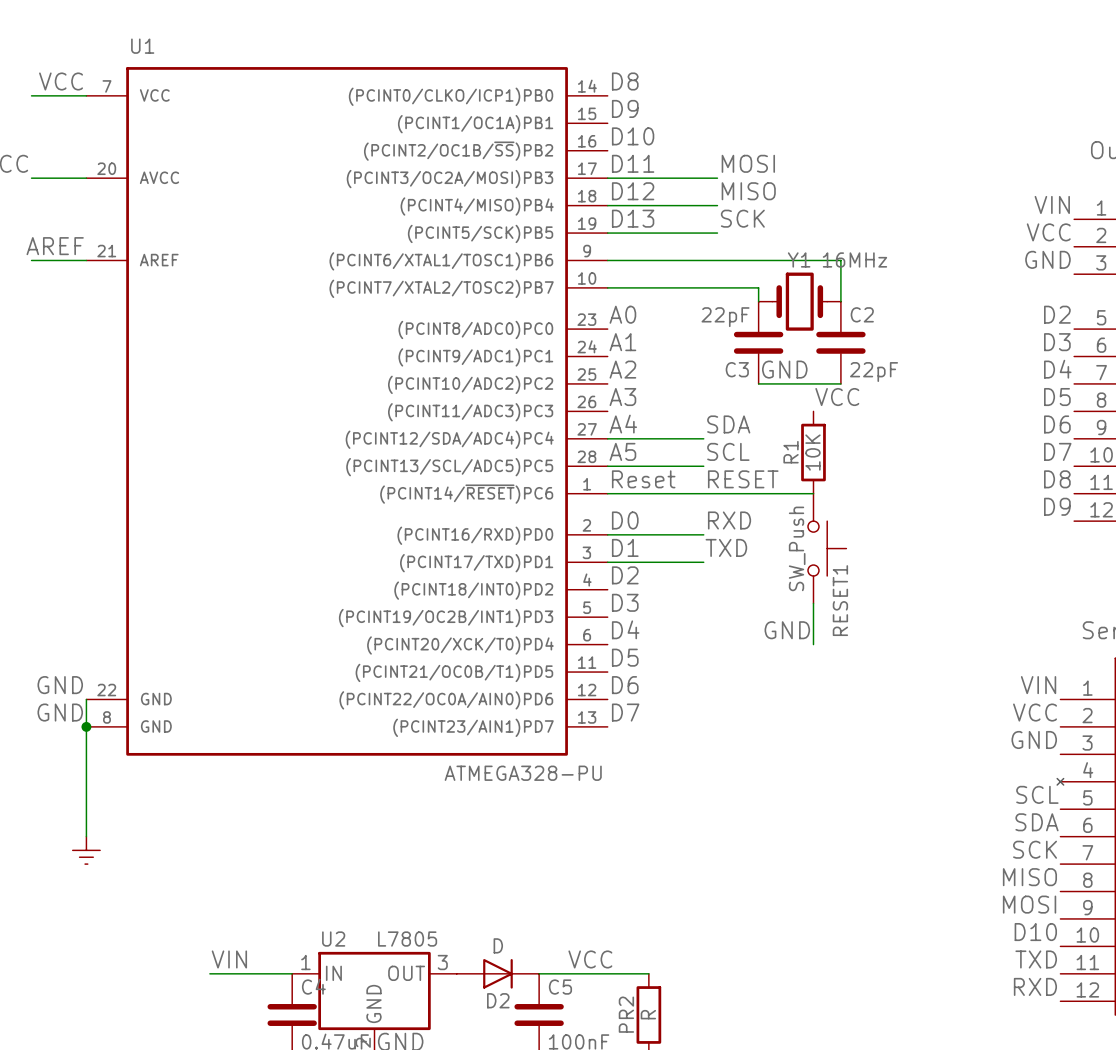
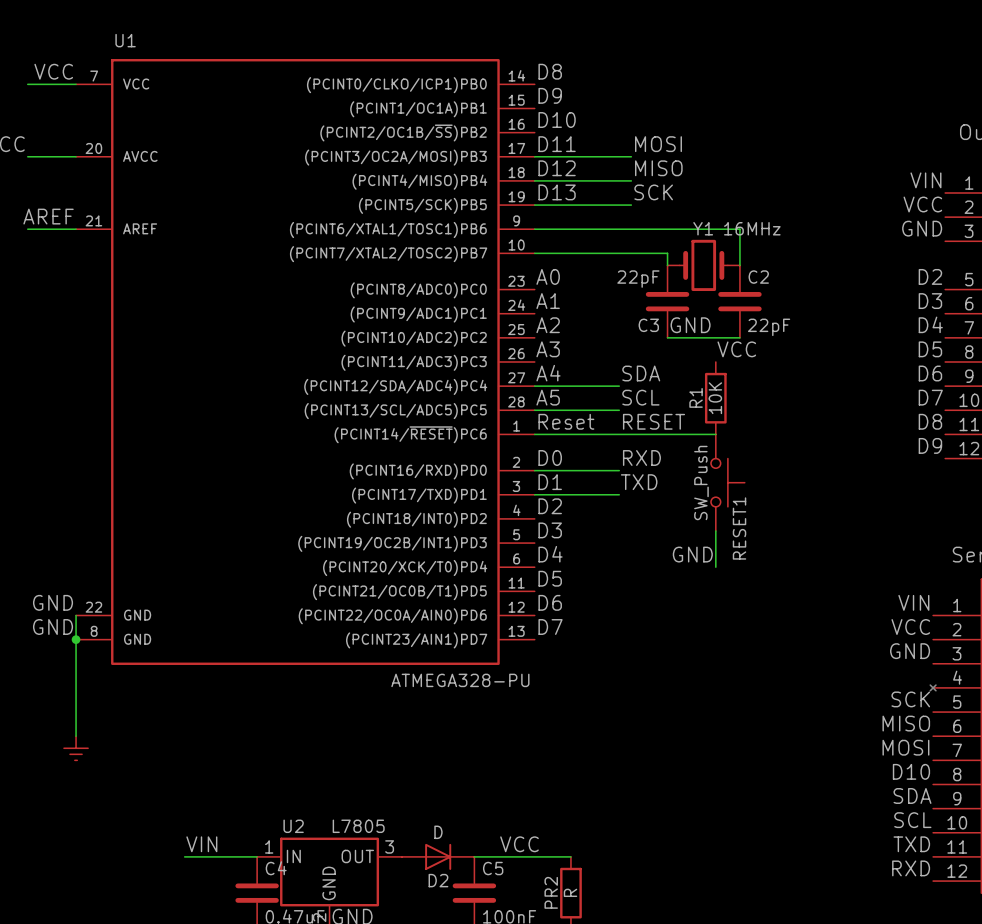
label: SCL (1037, 794) -> SCK (910, 699)
label: SDA (1036, 822) -> MISO (906, 723)
label: SCK (1035, 849) -> MOSI (905, 747)
label: MISO (1029, 877) -> D10 (911, 771)
label: MOSI (1029, 904) -> SDA (912, 795)
label: D10 (1035, 932) -> SCL (912, 820)

